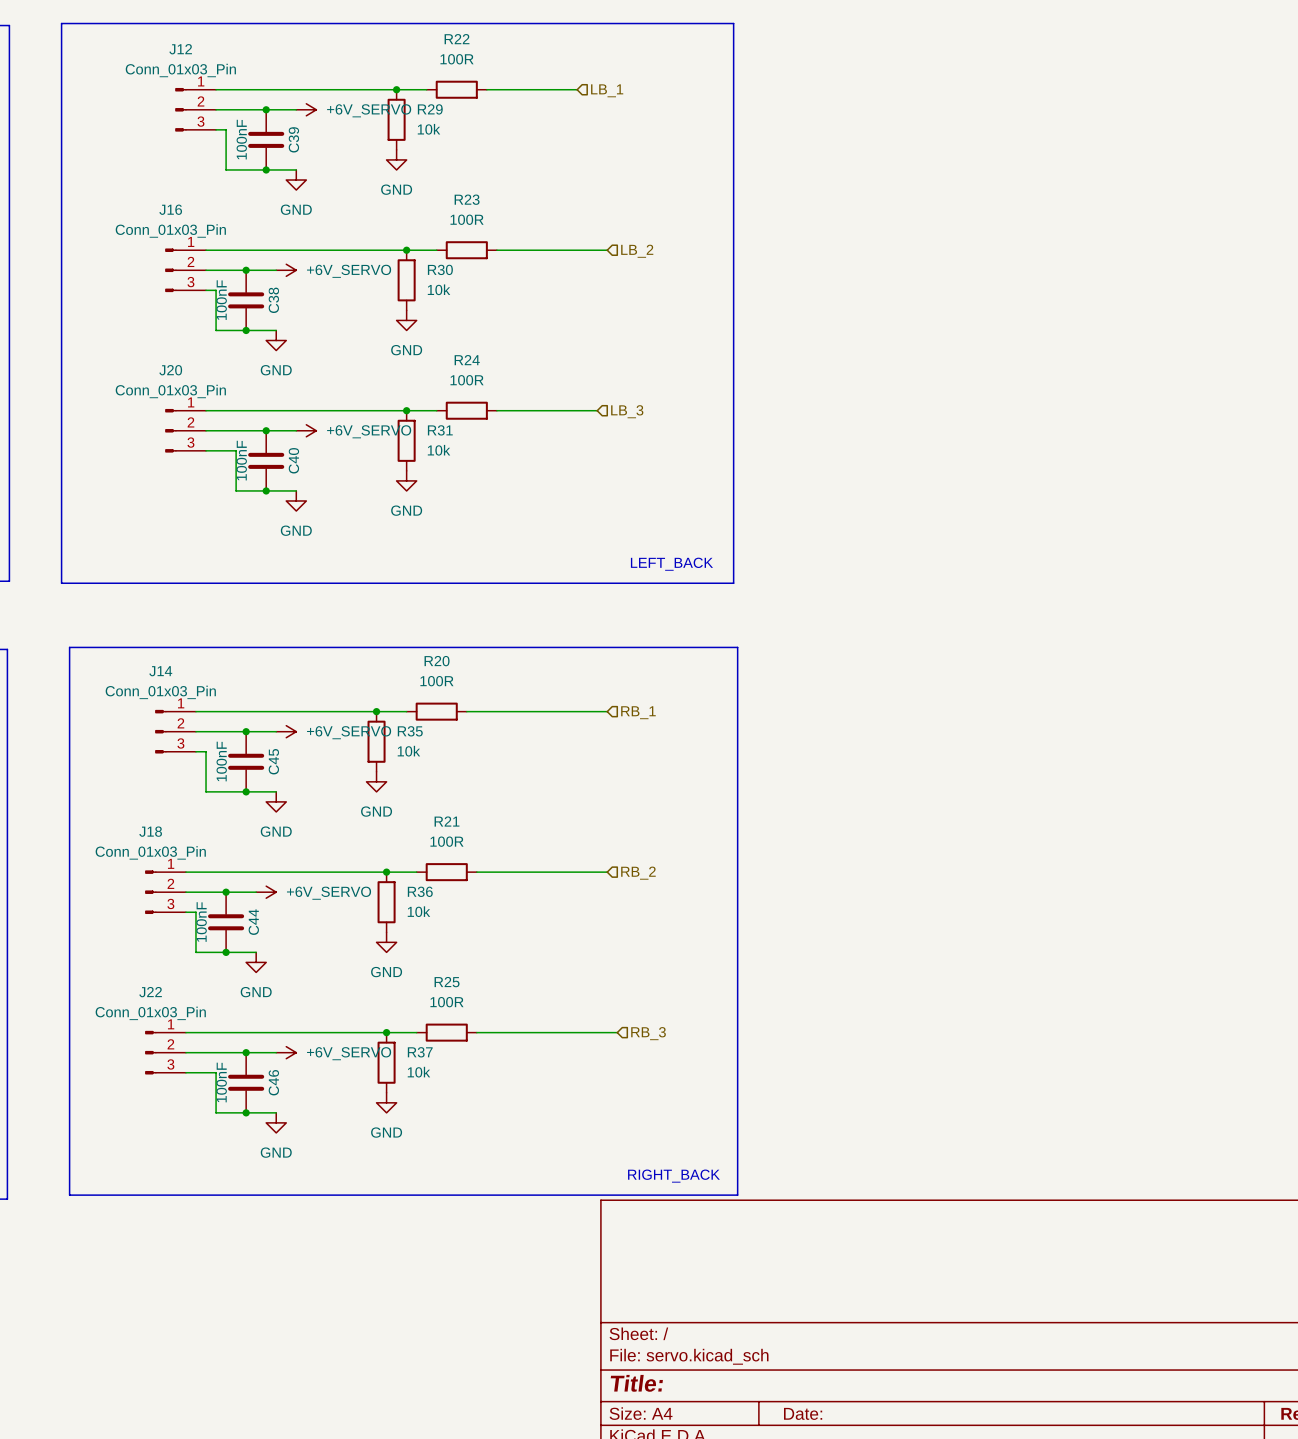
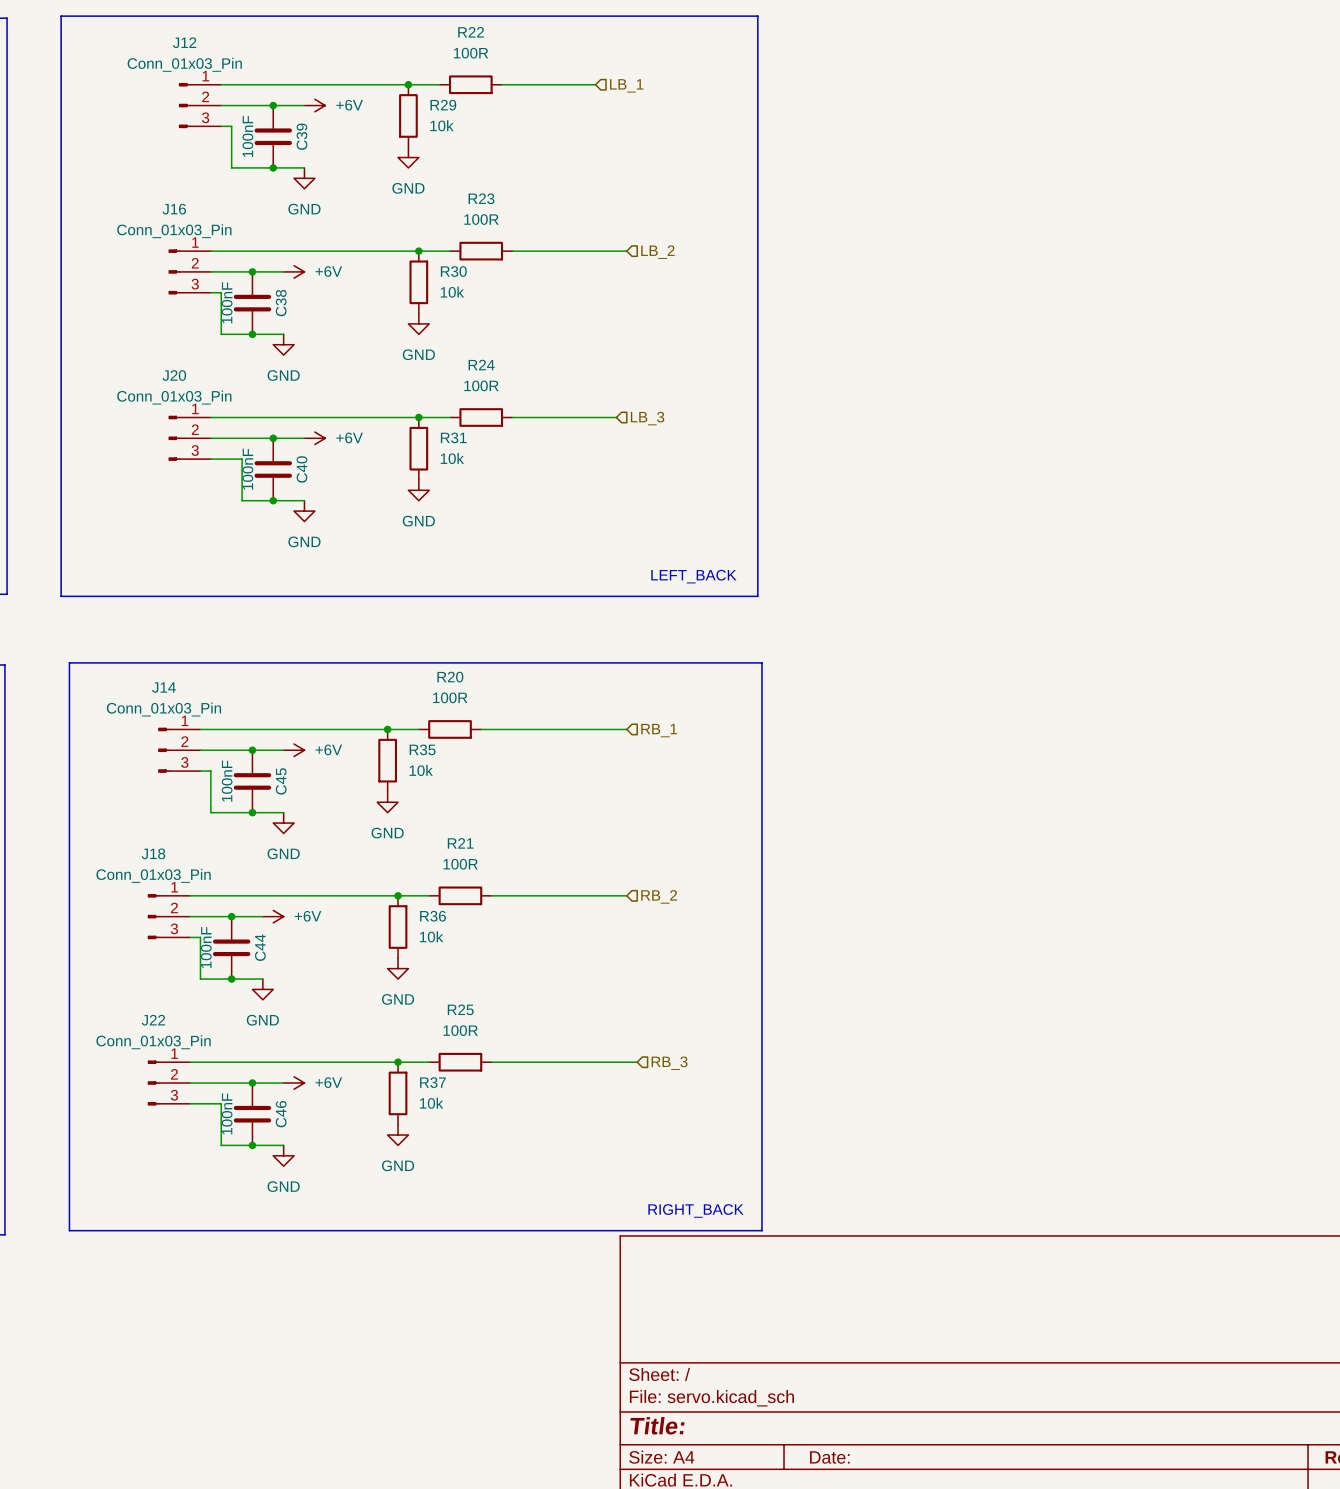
power symbol: +6V_SERVO (306, 109) -> +6V (314, 105)
power symbol: +6V_SERVO (286, 270) -> +6V (294, 271)
power symbol: +6V_SERVO (306, 430) -> +6V (314, 438)
power symbol: +6V_SERVO (286, 731) -> +6V (294, 750)
power symbol: +6V_SERVO (266, 892) -> +6V (273, 916)
power symbol: +6V_SERVO (286, 1052) -> +6V (294, 1083)

